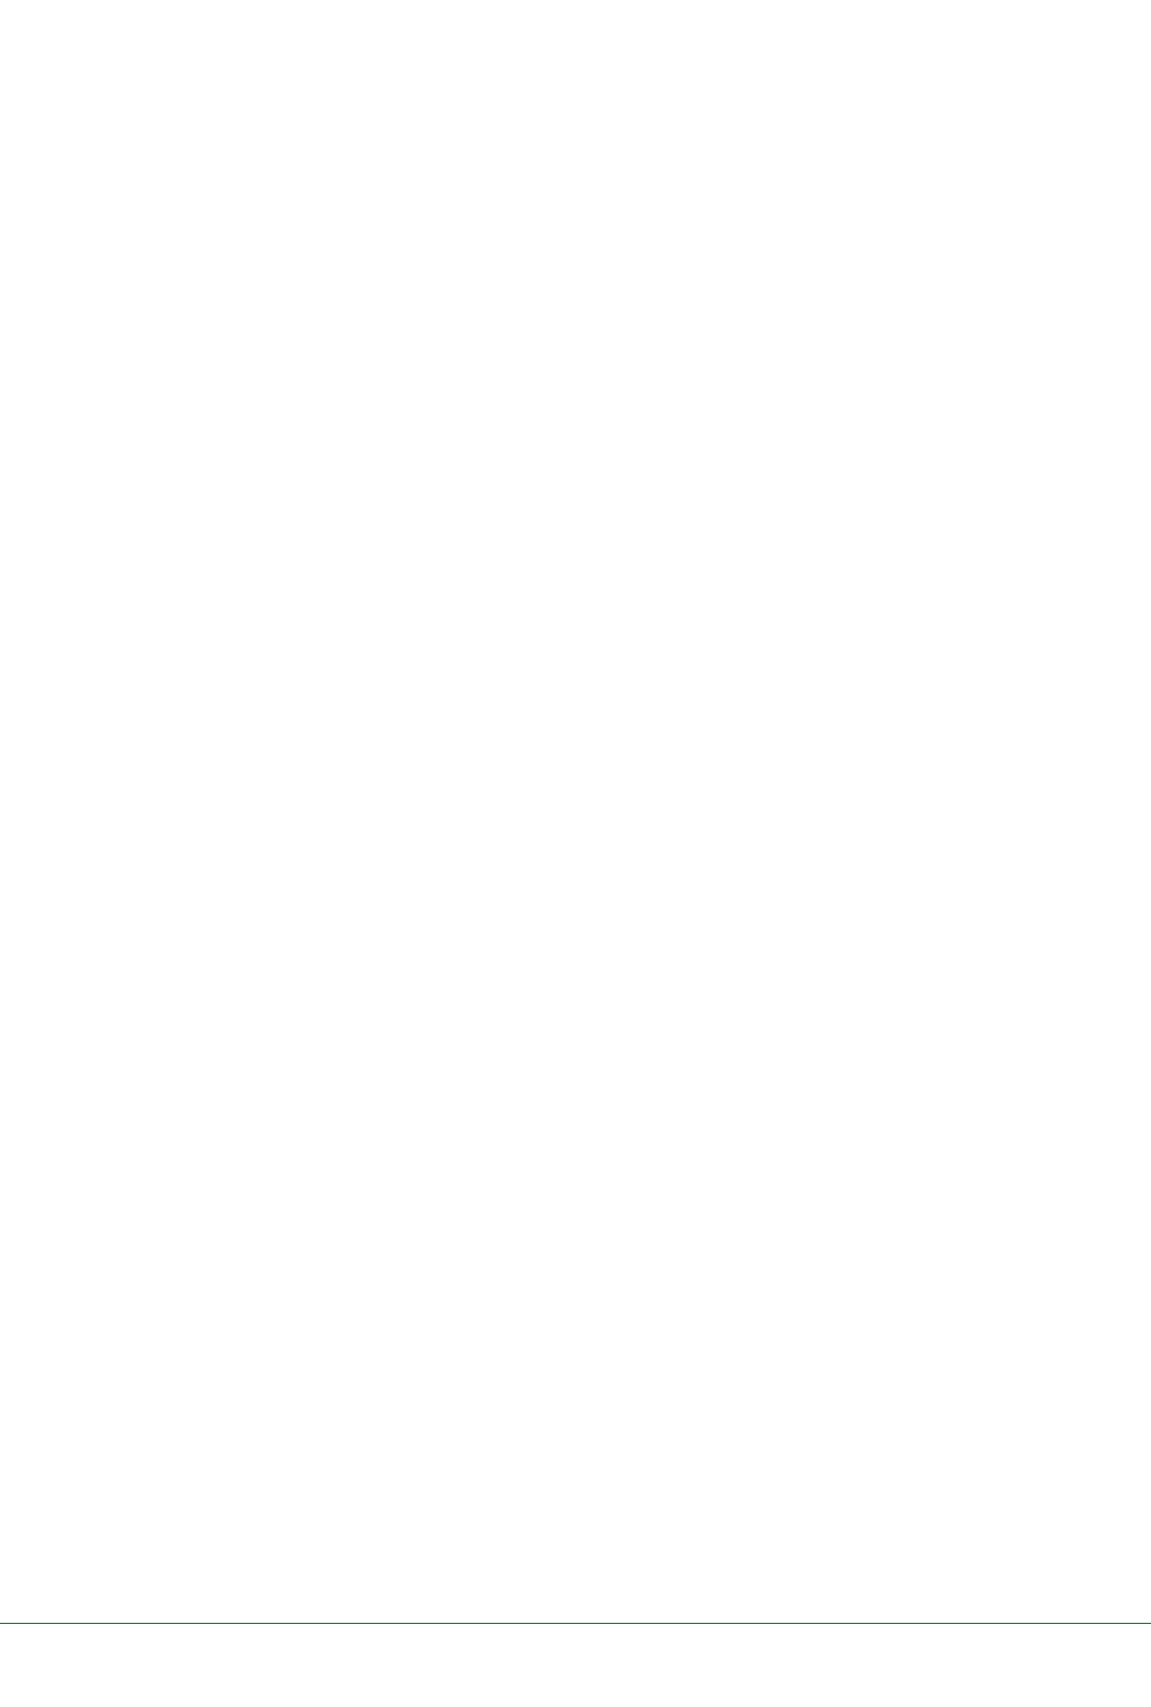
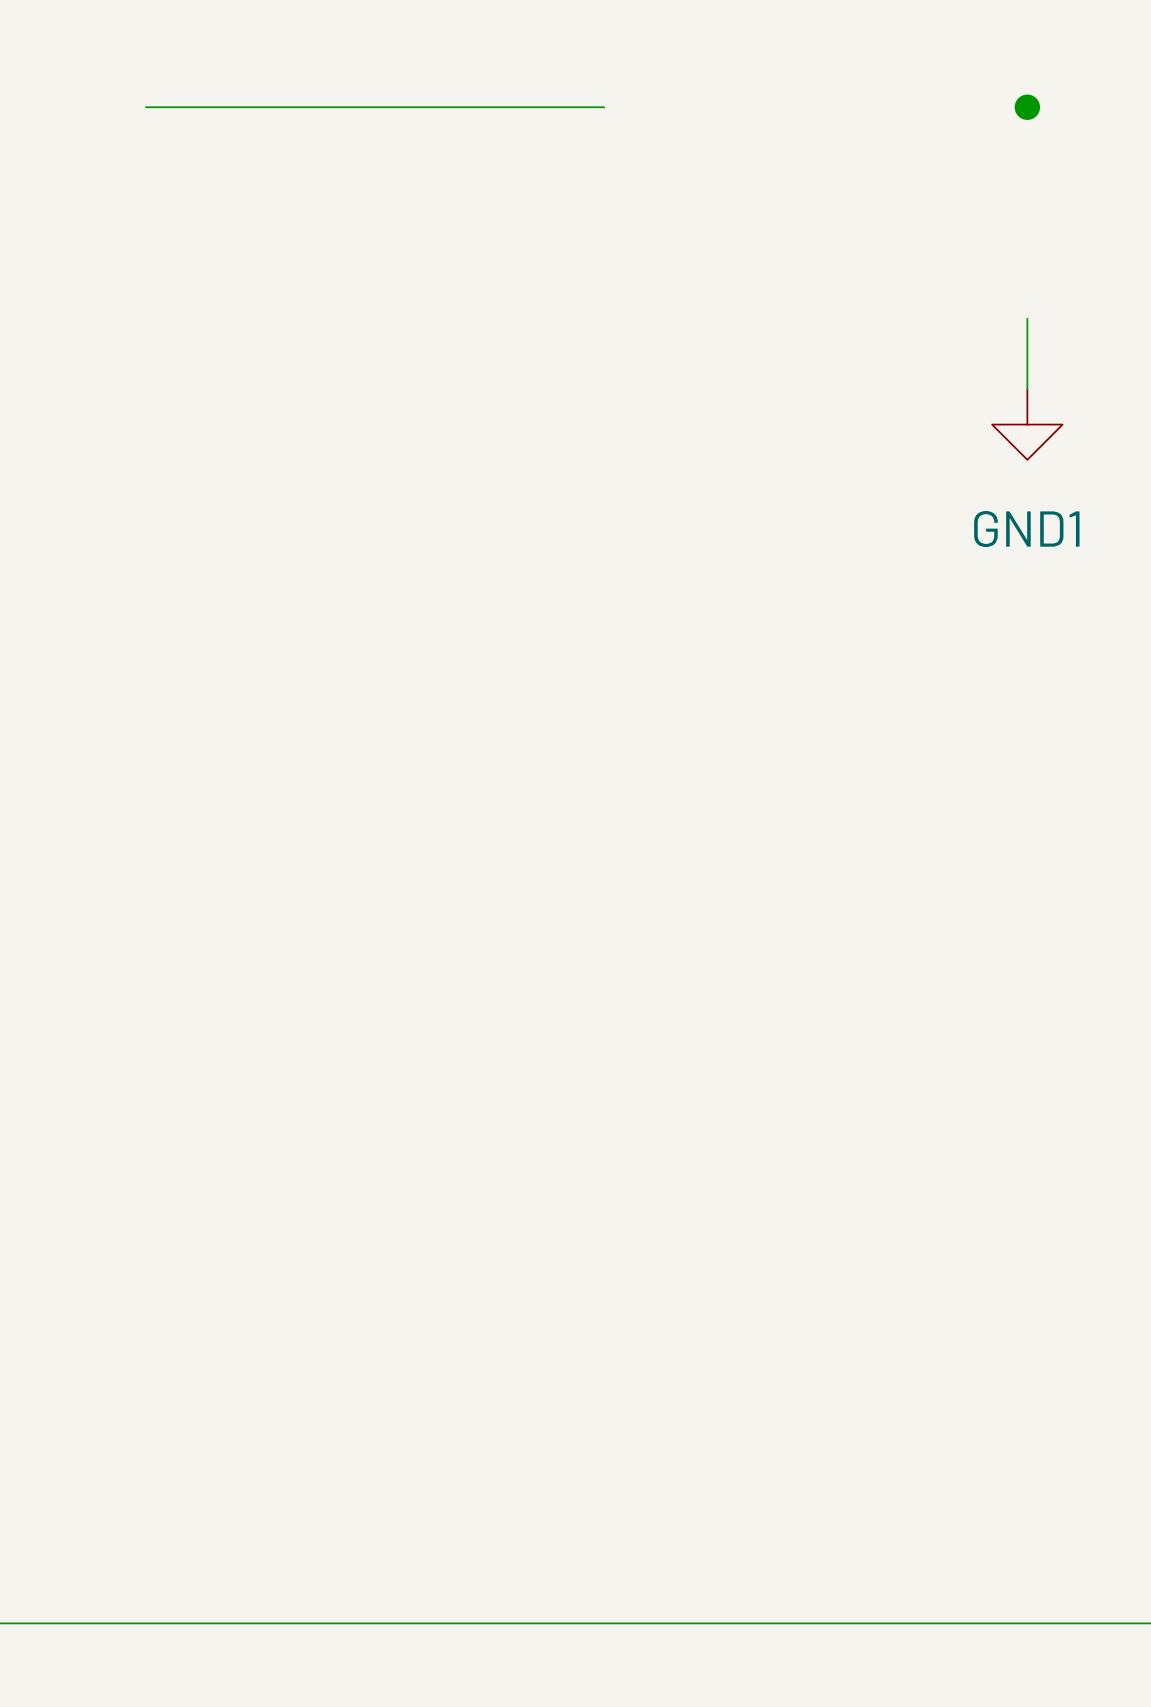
wire: none -> (145, 107) (604, 107)
junction: none -> (1027, 107)
wire: none -> (1027, 318) (1027, 389)
power symbol: none -> GND1 (1027, 424)

